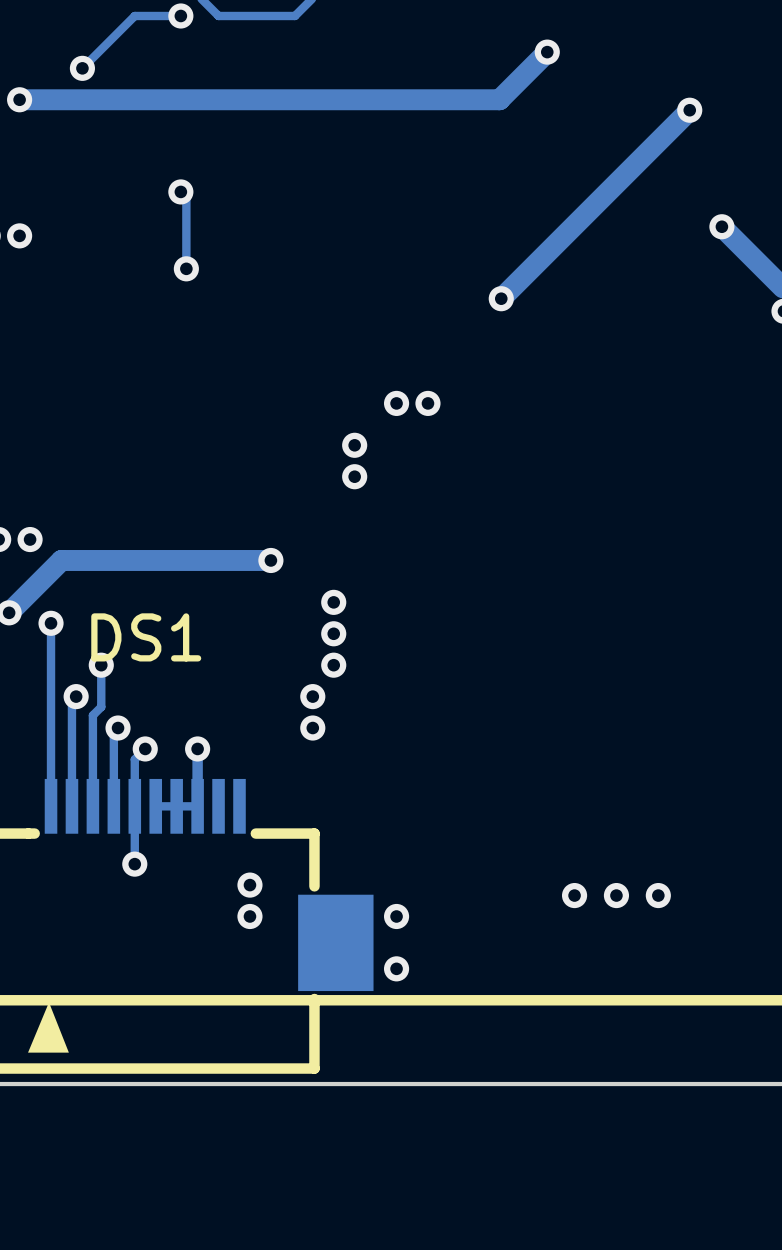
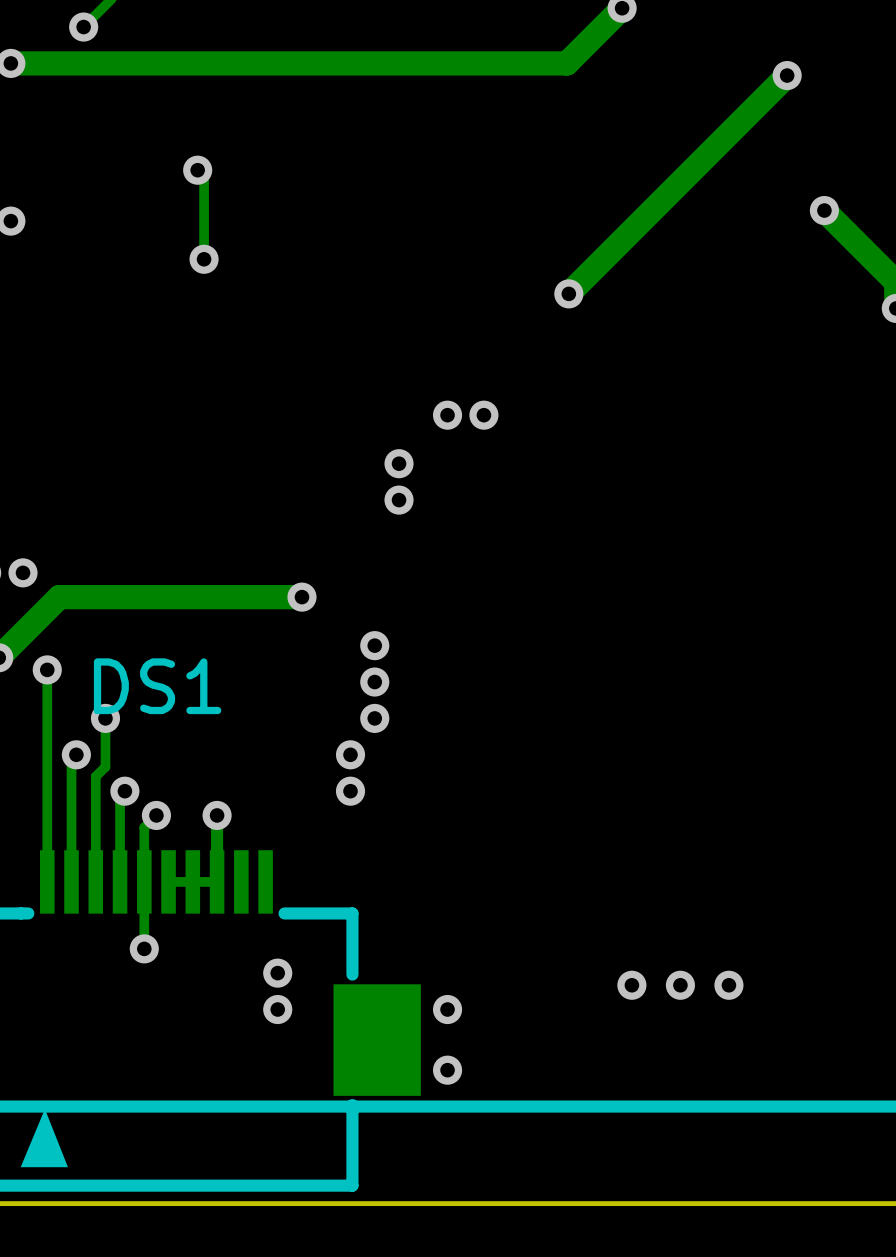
via: none -> (631, 985)
via: (574, 895) -> none
via: none -> (680, 985)
via: (616, 895) -> none
via: none -> (728, 985)
via: (658, 895) -> none

